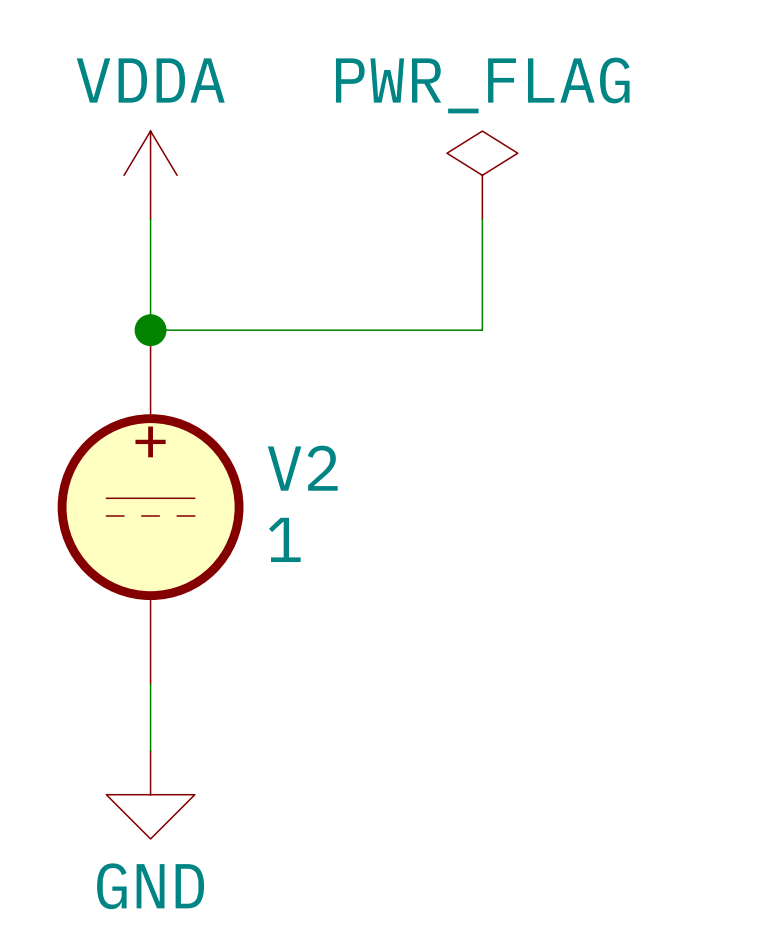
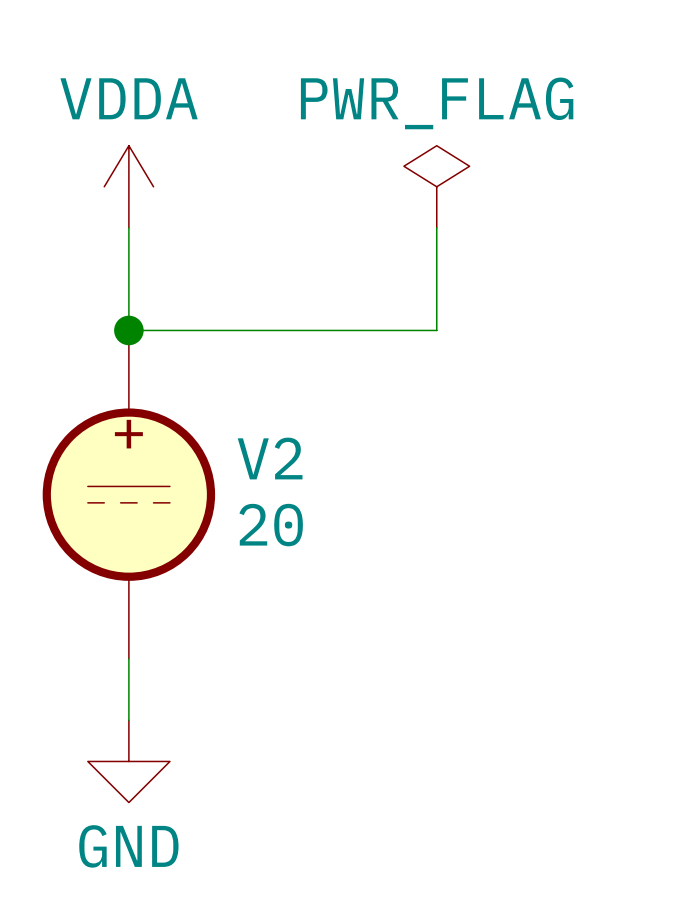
V2 value: 1 (284, 539) -> 20 (271, 525)

